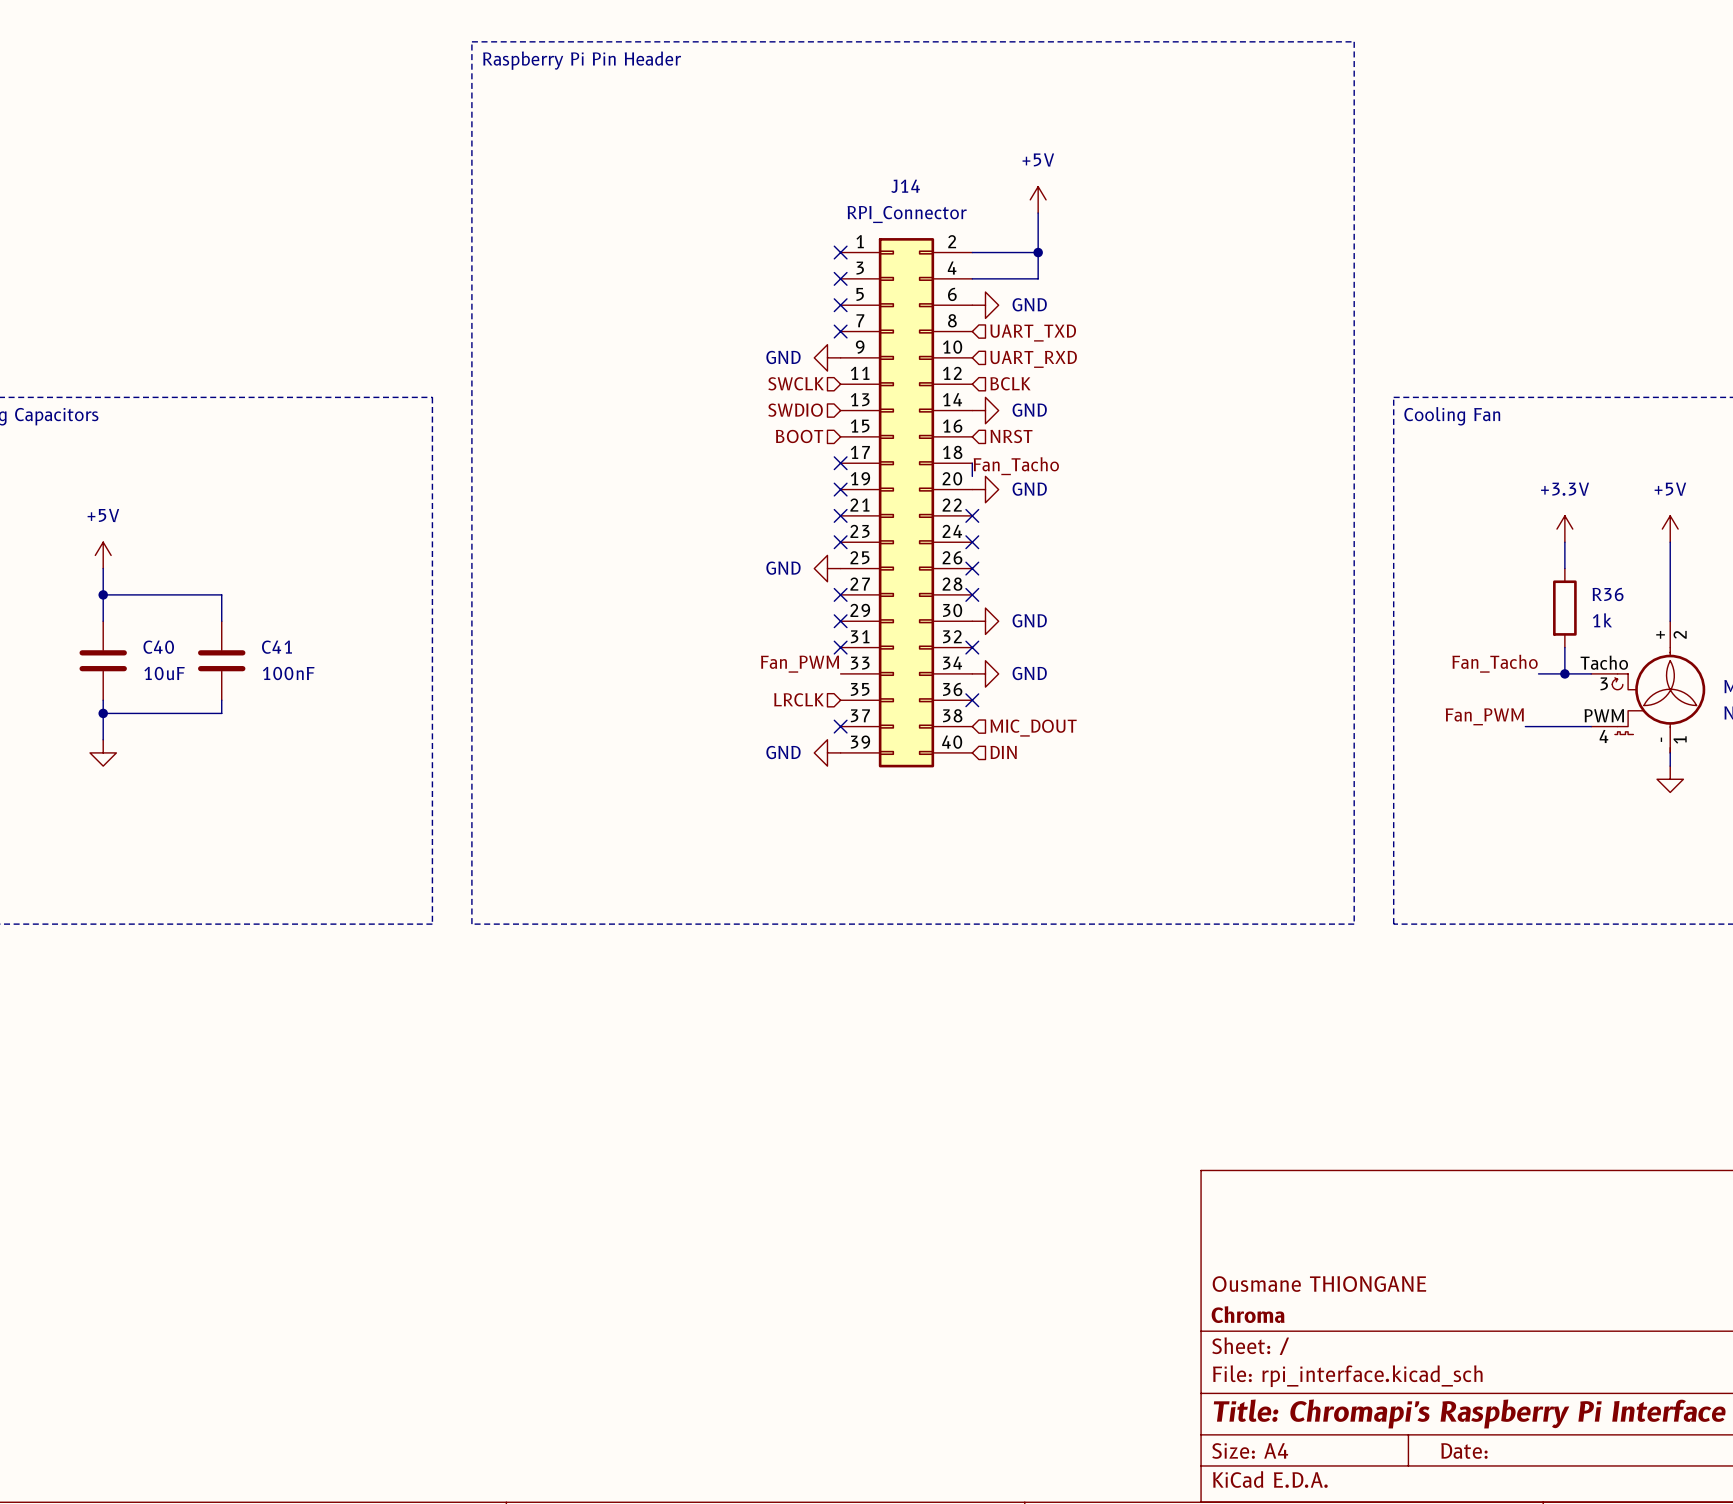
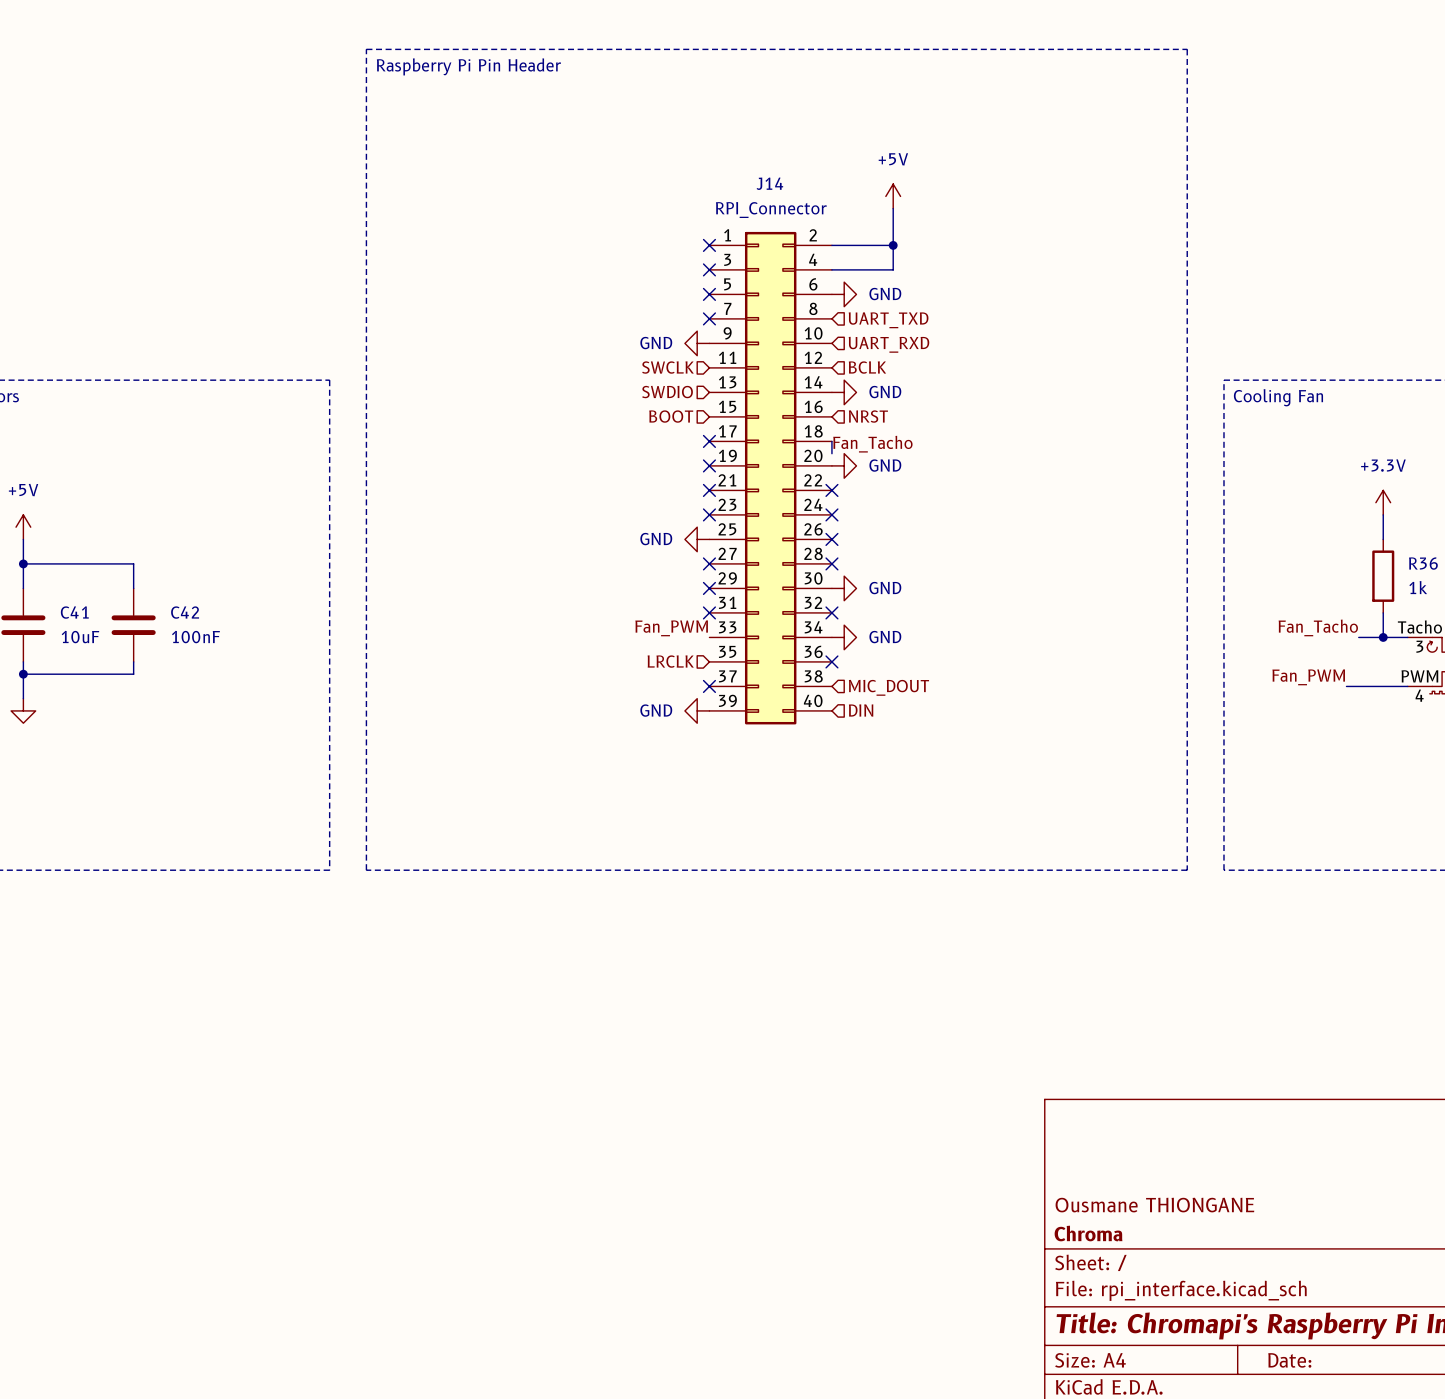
C40 name: C40 (158, 647) -> C41 (74, 612)
C41 name: C41 (276, 647) -> C42 (185, 612)

